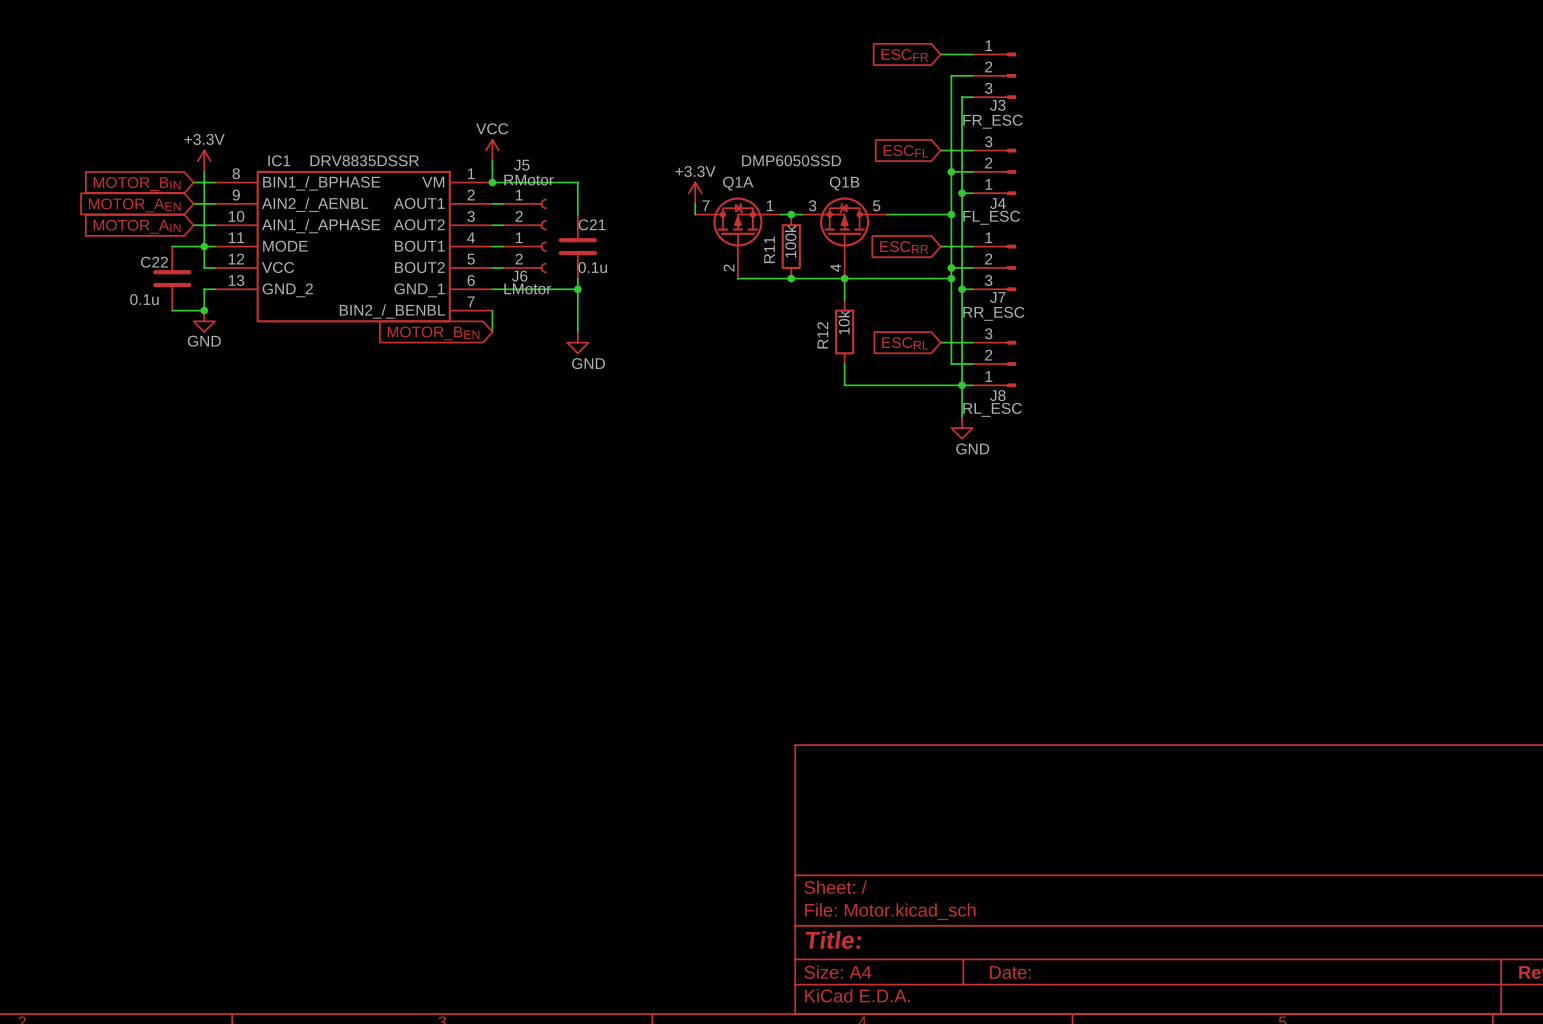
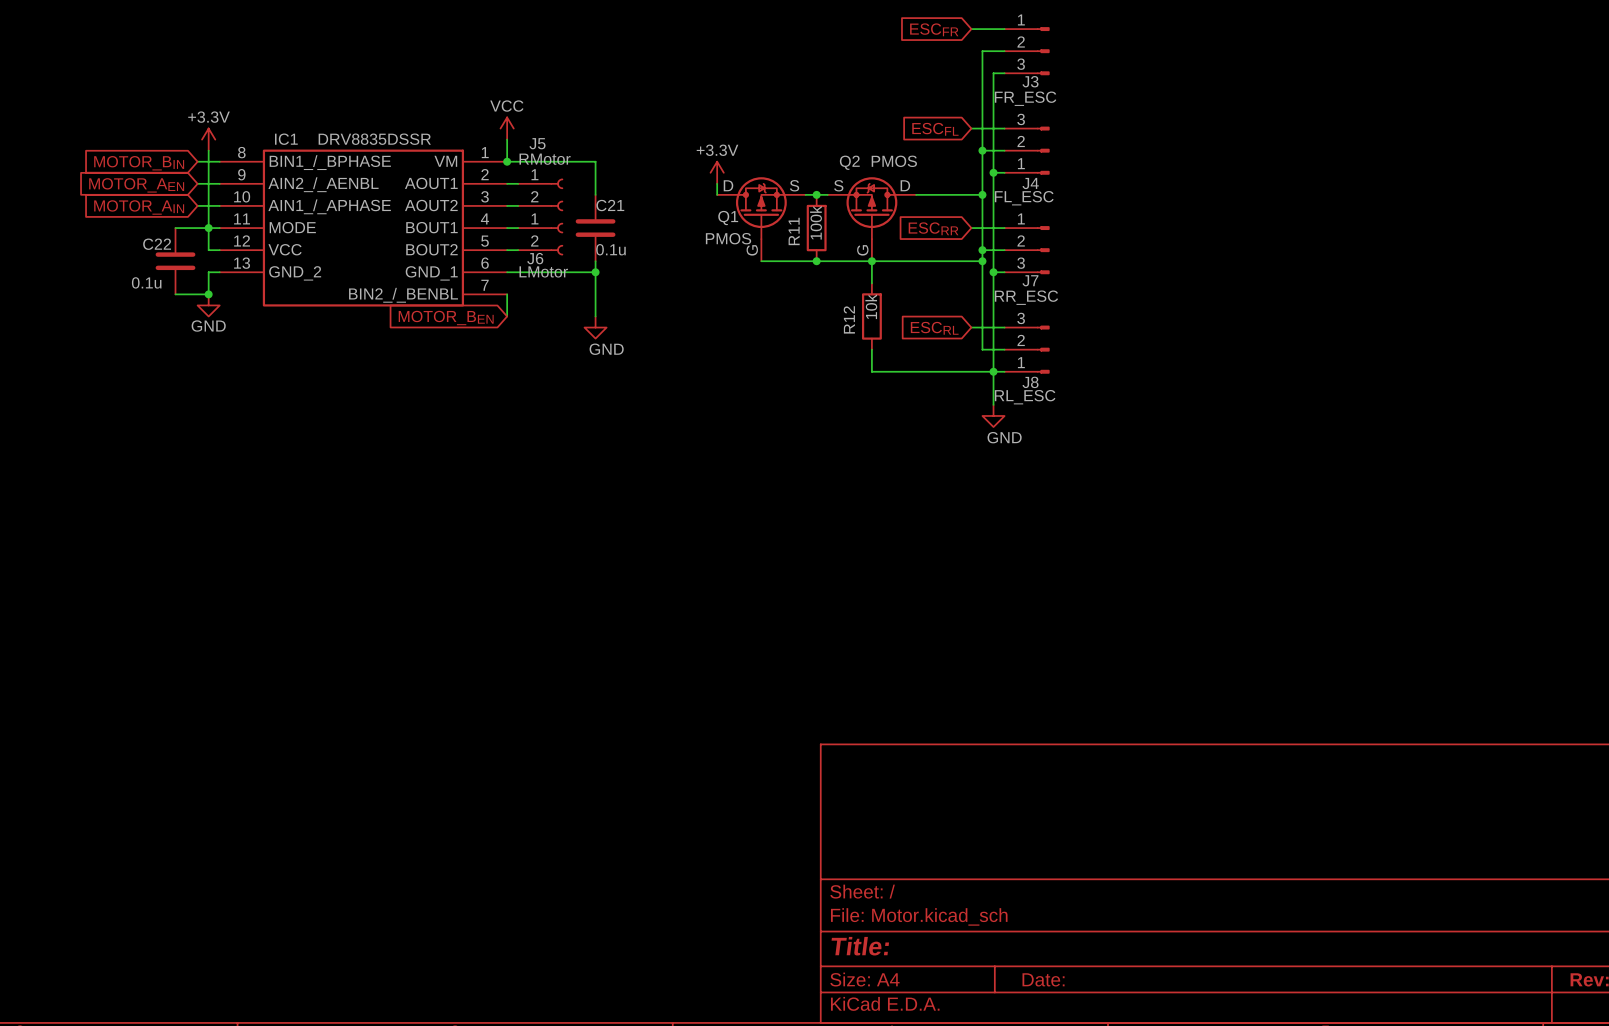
Q1A value: DMP6050SSD (791, 160) -> PMOS (728, 238)
Q1B value: none -> PMOS (894, 161)
Q1A name: Q1A (738, 183) -> Q1 (728, 218)
Q1B name: Q1B (844, 183) -> Q2 (849, 162)
Q1A pin number: 7 (705, 205) -> none
Q1A pin name: none -> D (728, 185)
Q1A pin name: none -> S (794, 185)
Q1A pin number: 1 (770, 205) -> none
Q1B pin name: none -> S (838, 185)
Q1B pin number: 3 (812, 205) -> none
Q1B pin name: none -> D (905, 185)
Q1B pin number: 5 (876, 205) -> none
Q1A pin number: 2 (729, 267) -> none
Q1B pin number: 4 (835, 267) -> none
Q1A pin name: none -> G (752, 250)
Q1B pin name: none -> G (862, 250)

